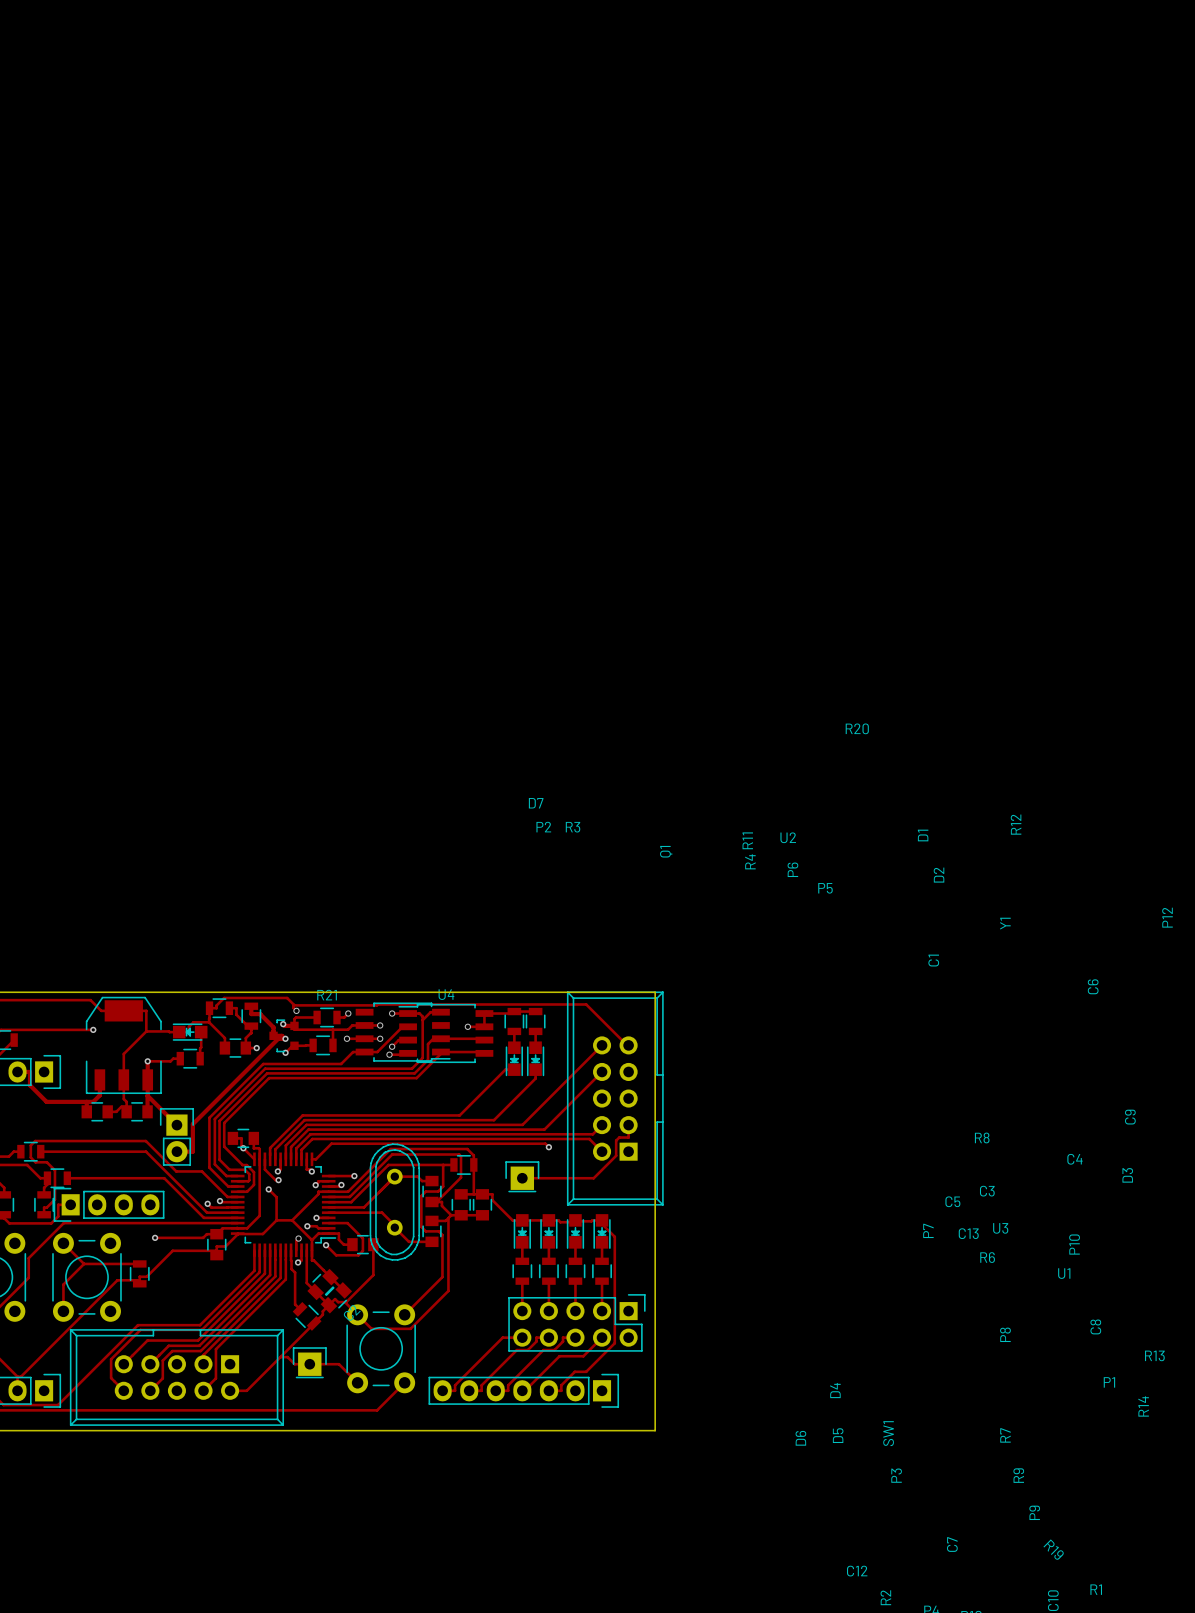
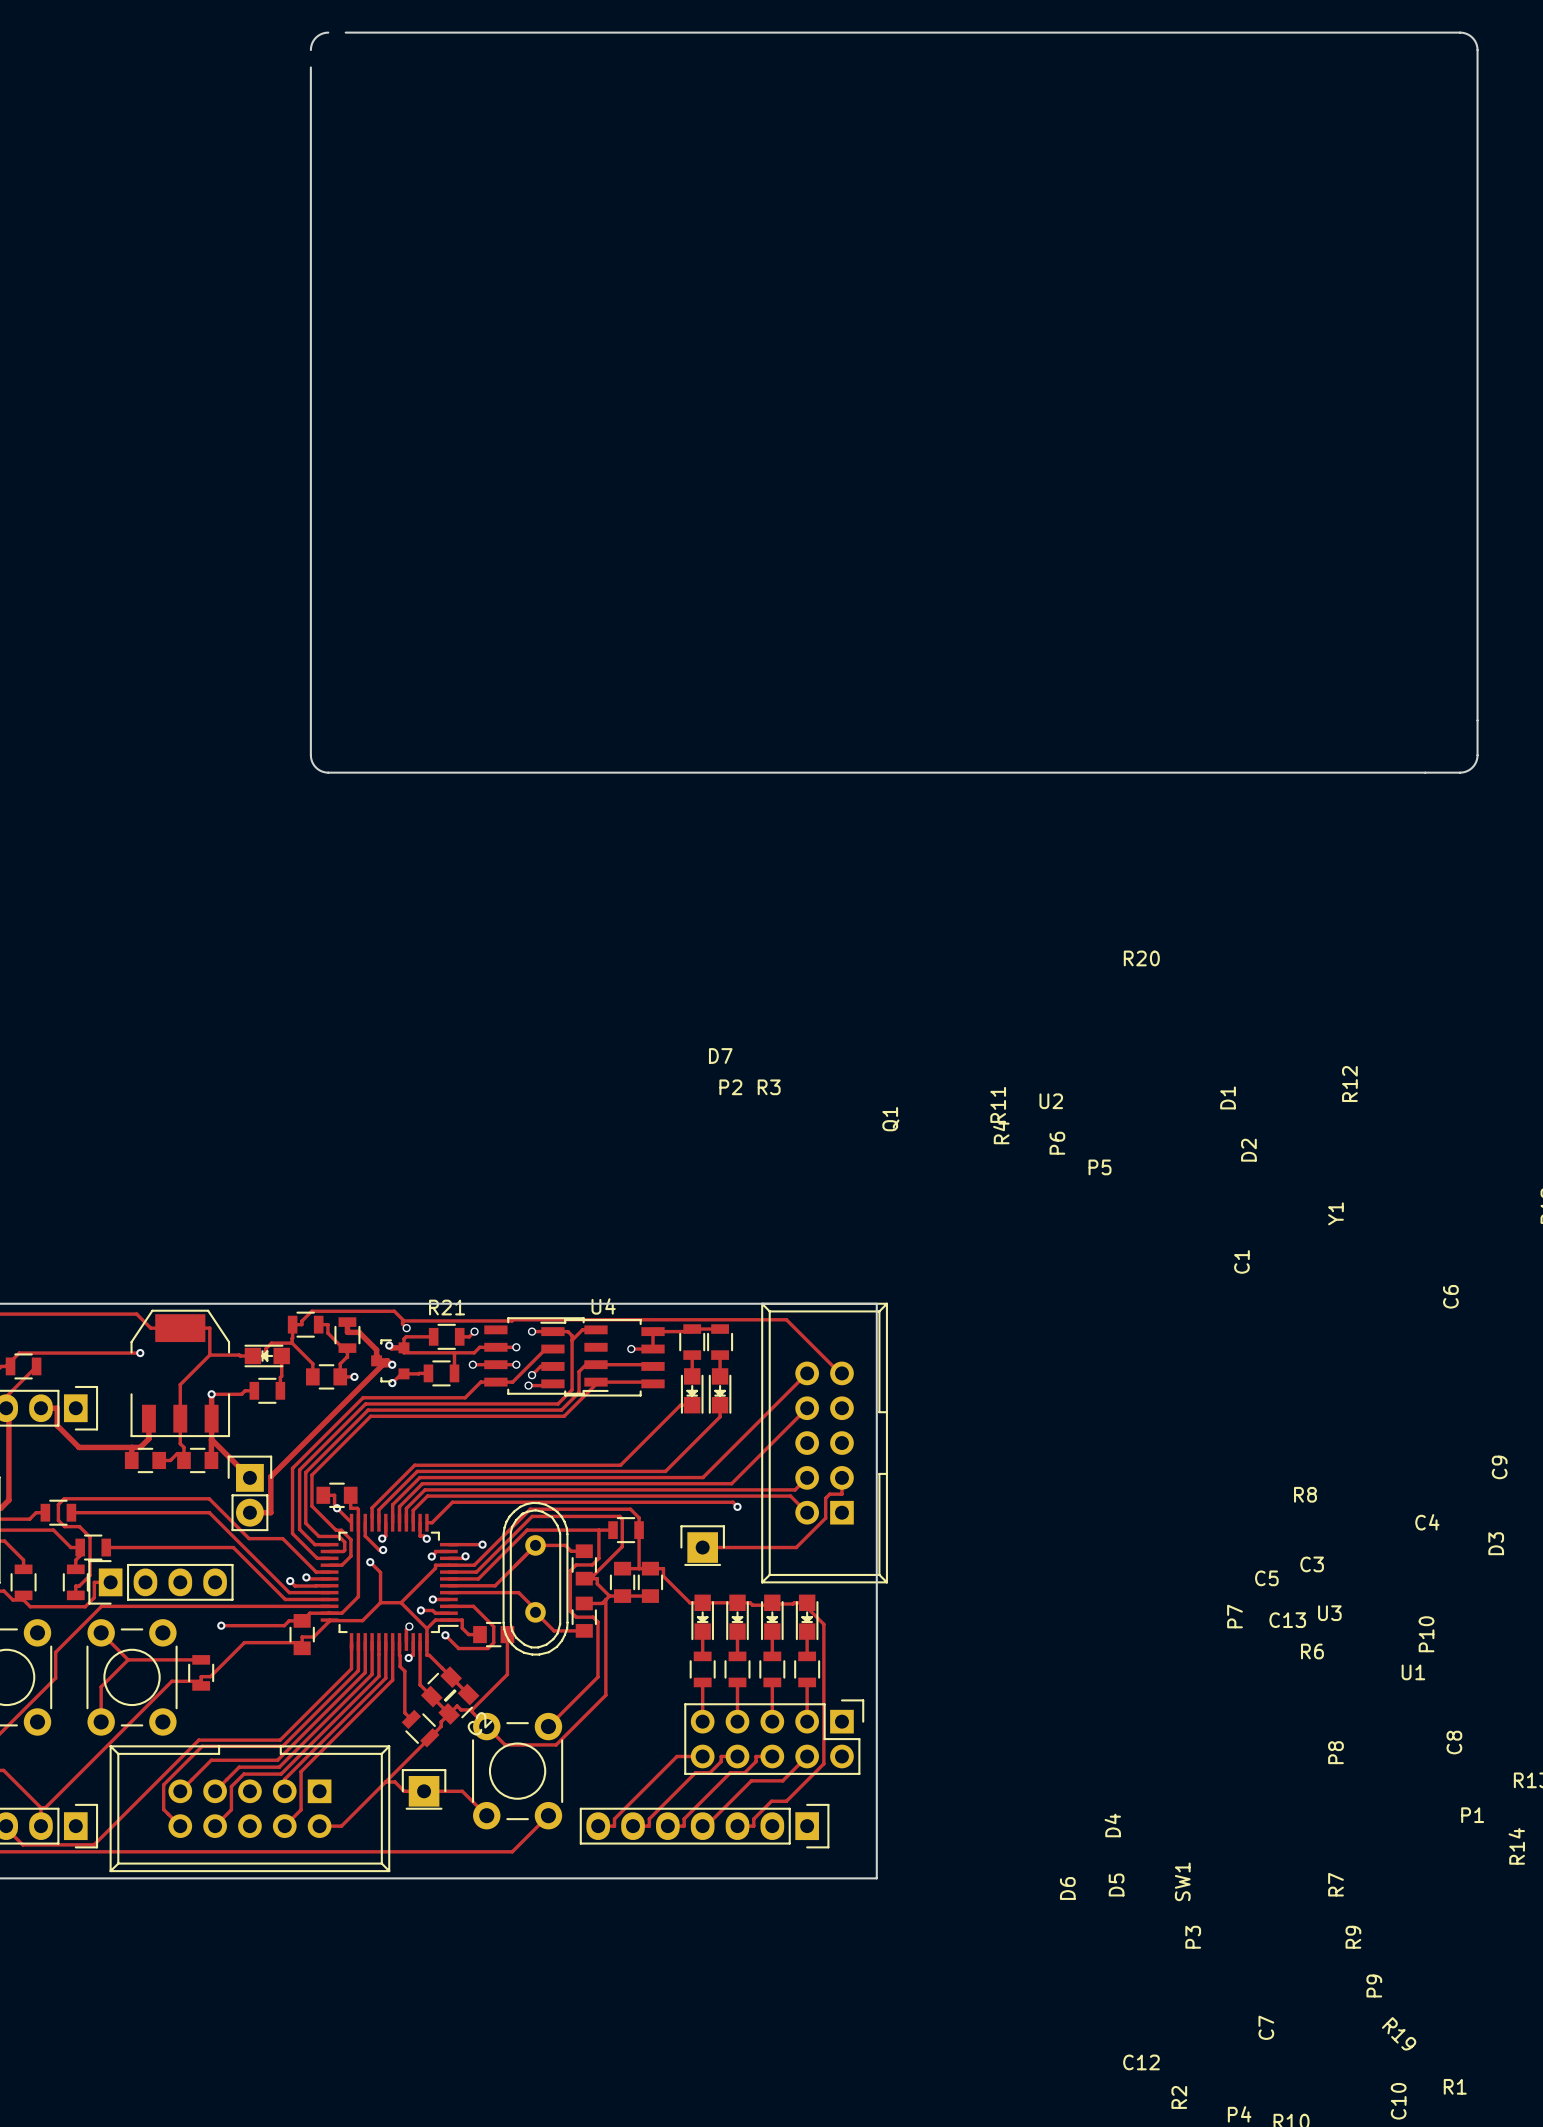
board edge: none -> (328, 32) (315, 37) (310, 50)
board edge: none -> (345, 32) (1460, 32) (1468, 34) (1475, 41) (1477, 50) (1477, 755) (1475, 763) (1468, 770) (1460, 772) (328, 772) (319, 770) (313, 763) (310, 755) (310, 67)

